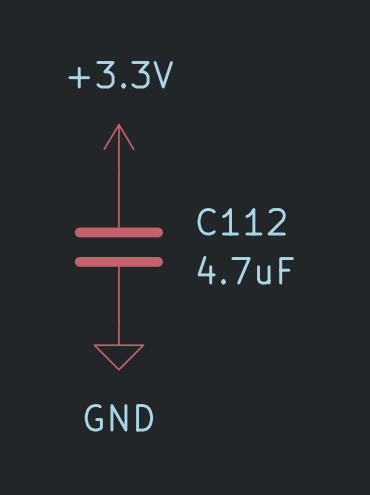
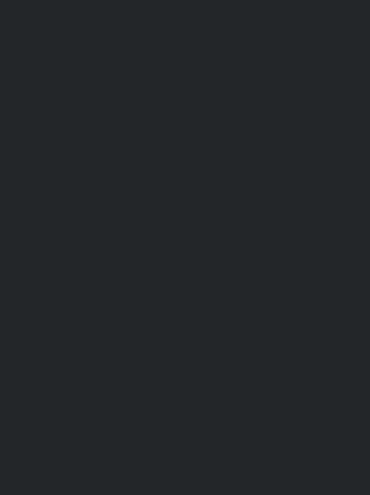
power symbol: +3.3V (118, 149) -> none
C112: 4.7uF (118, 247) -> none
power symbol: GND (118, 345) -> none

